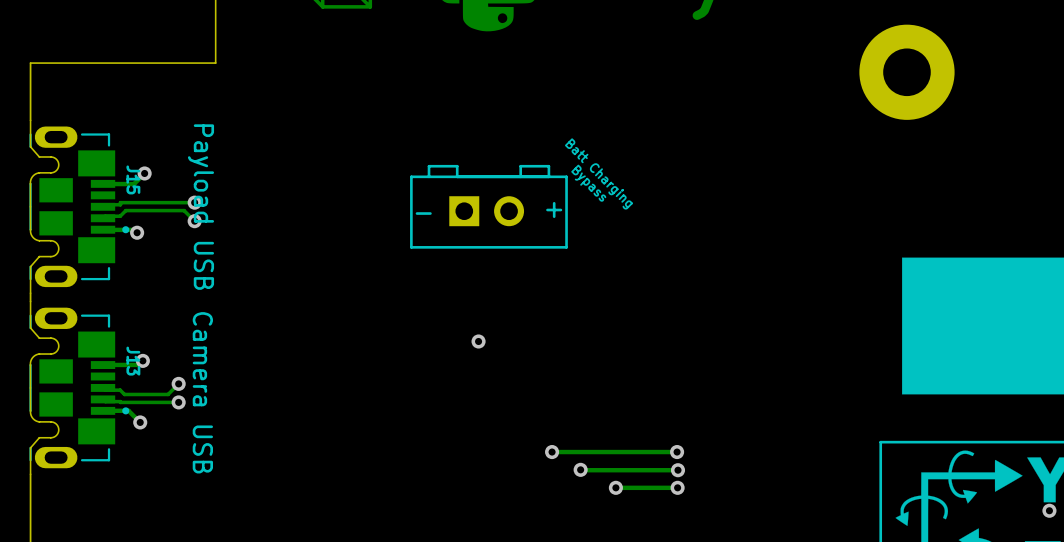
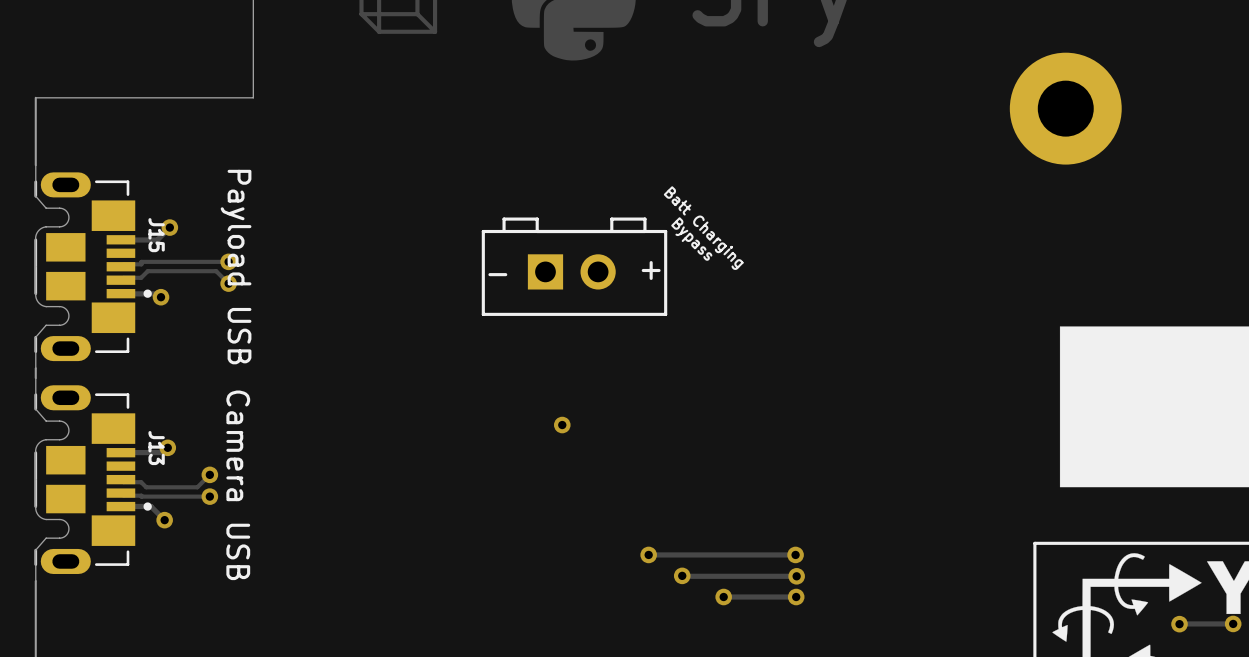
via: none -> (1179, 624)
track: none -> (1233, 623) (1179, 623)

